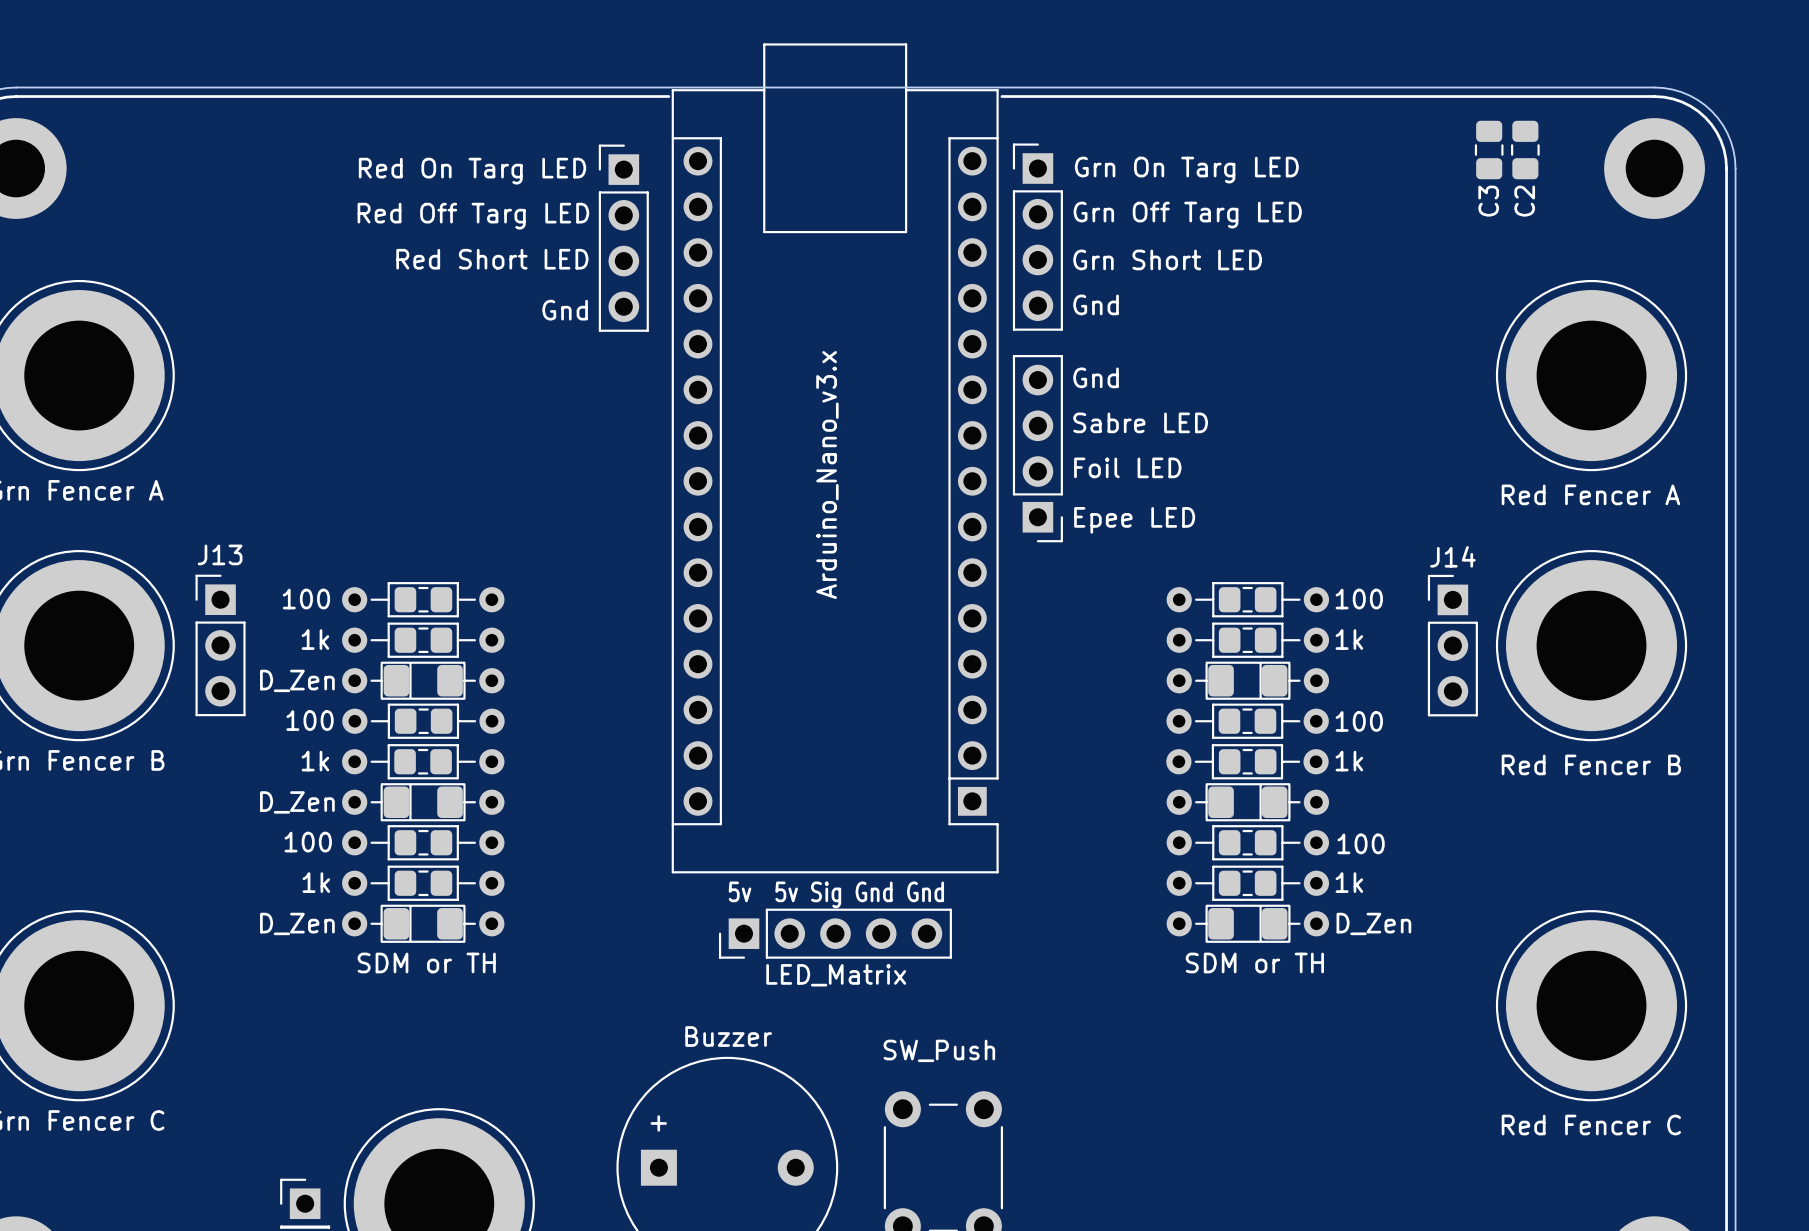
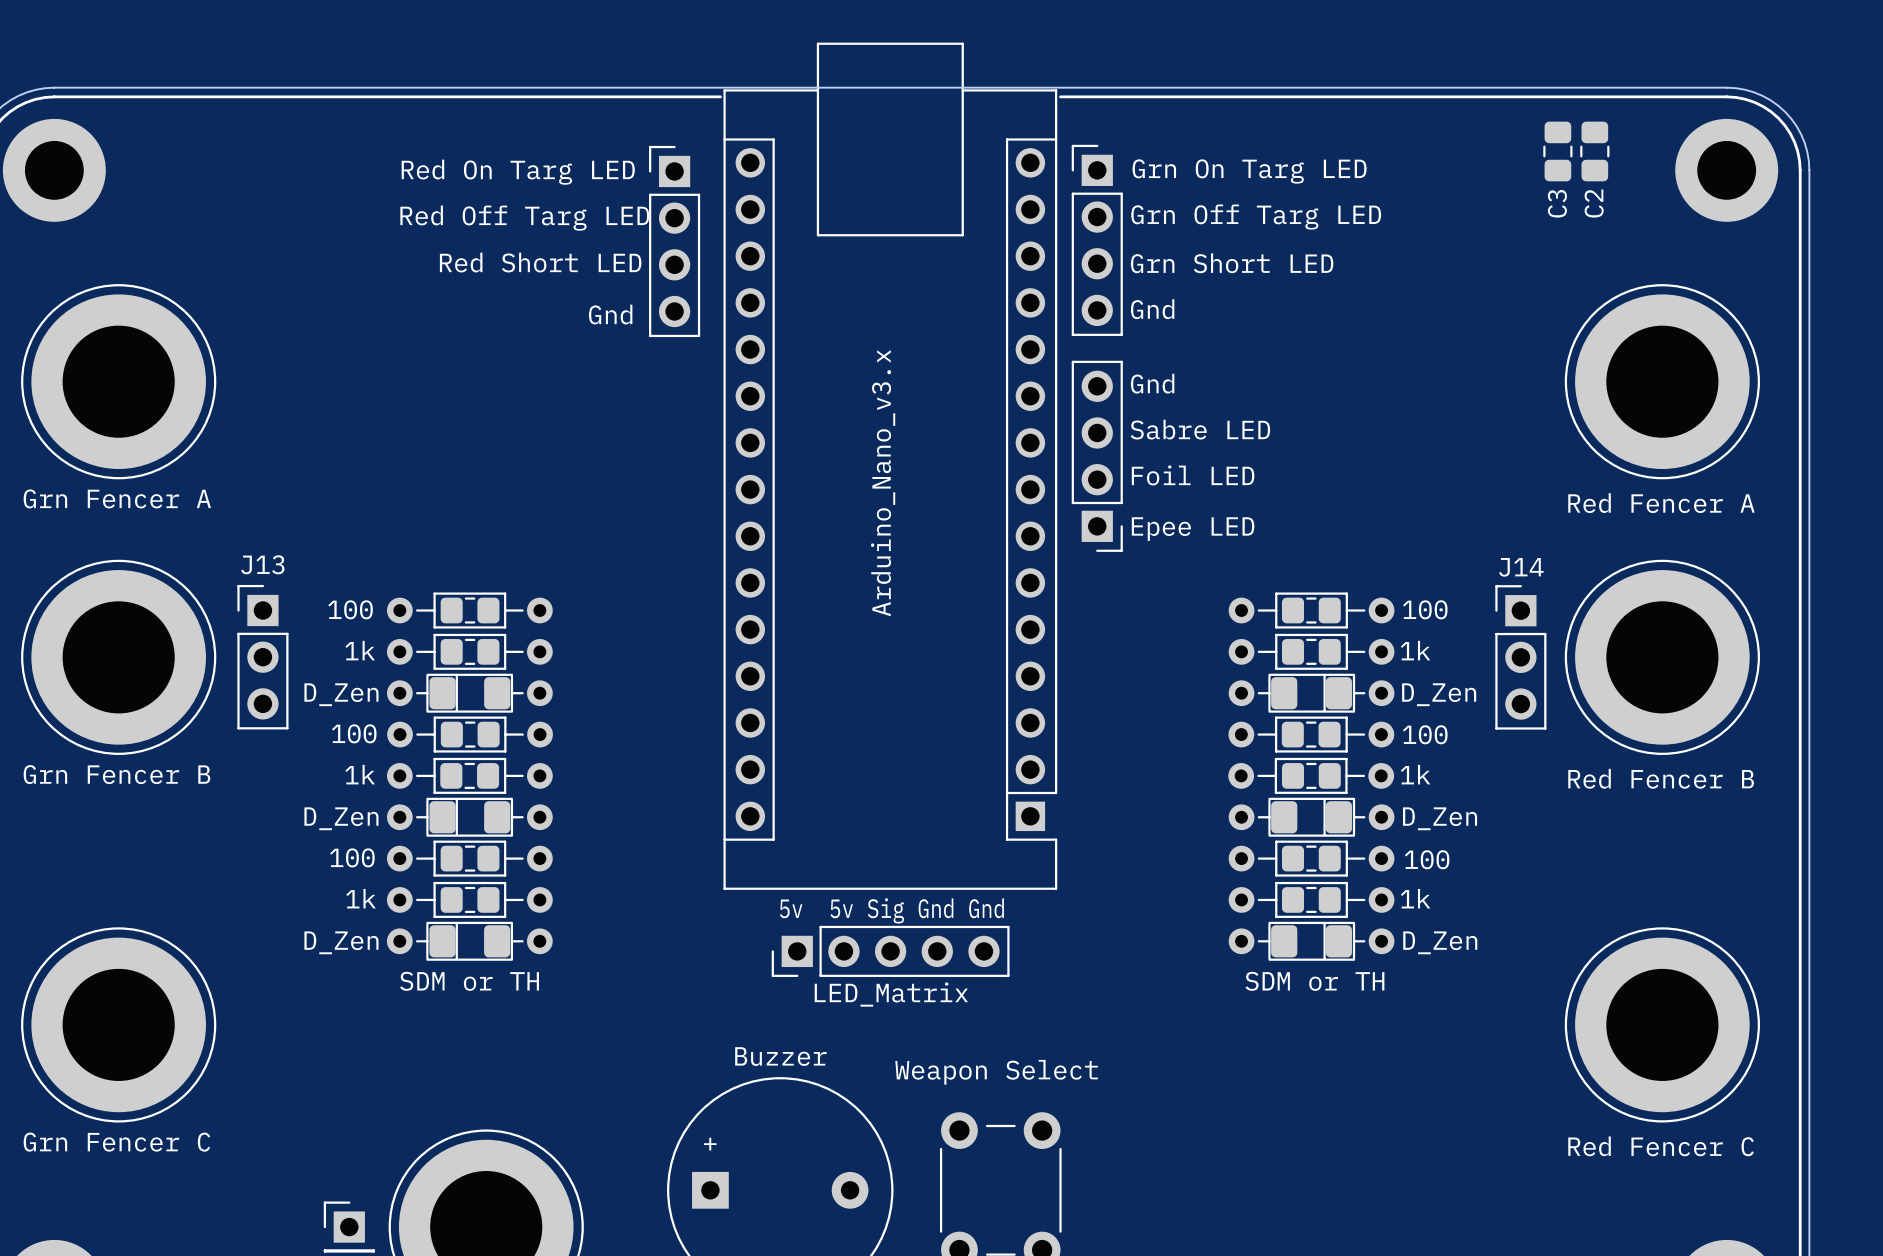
part value: none -> D_Zen (1439, 694)
part value: none -> D_Zen (1440, 818)
part value: SW_Push (939, 1050) -> Weapon Select (996, 1072)

